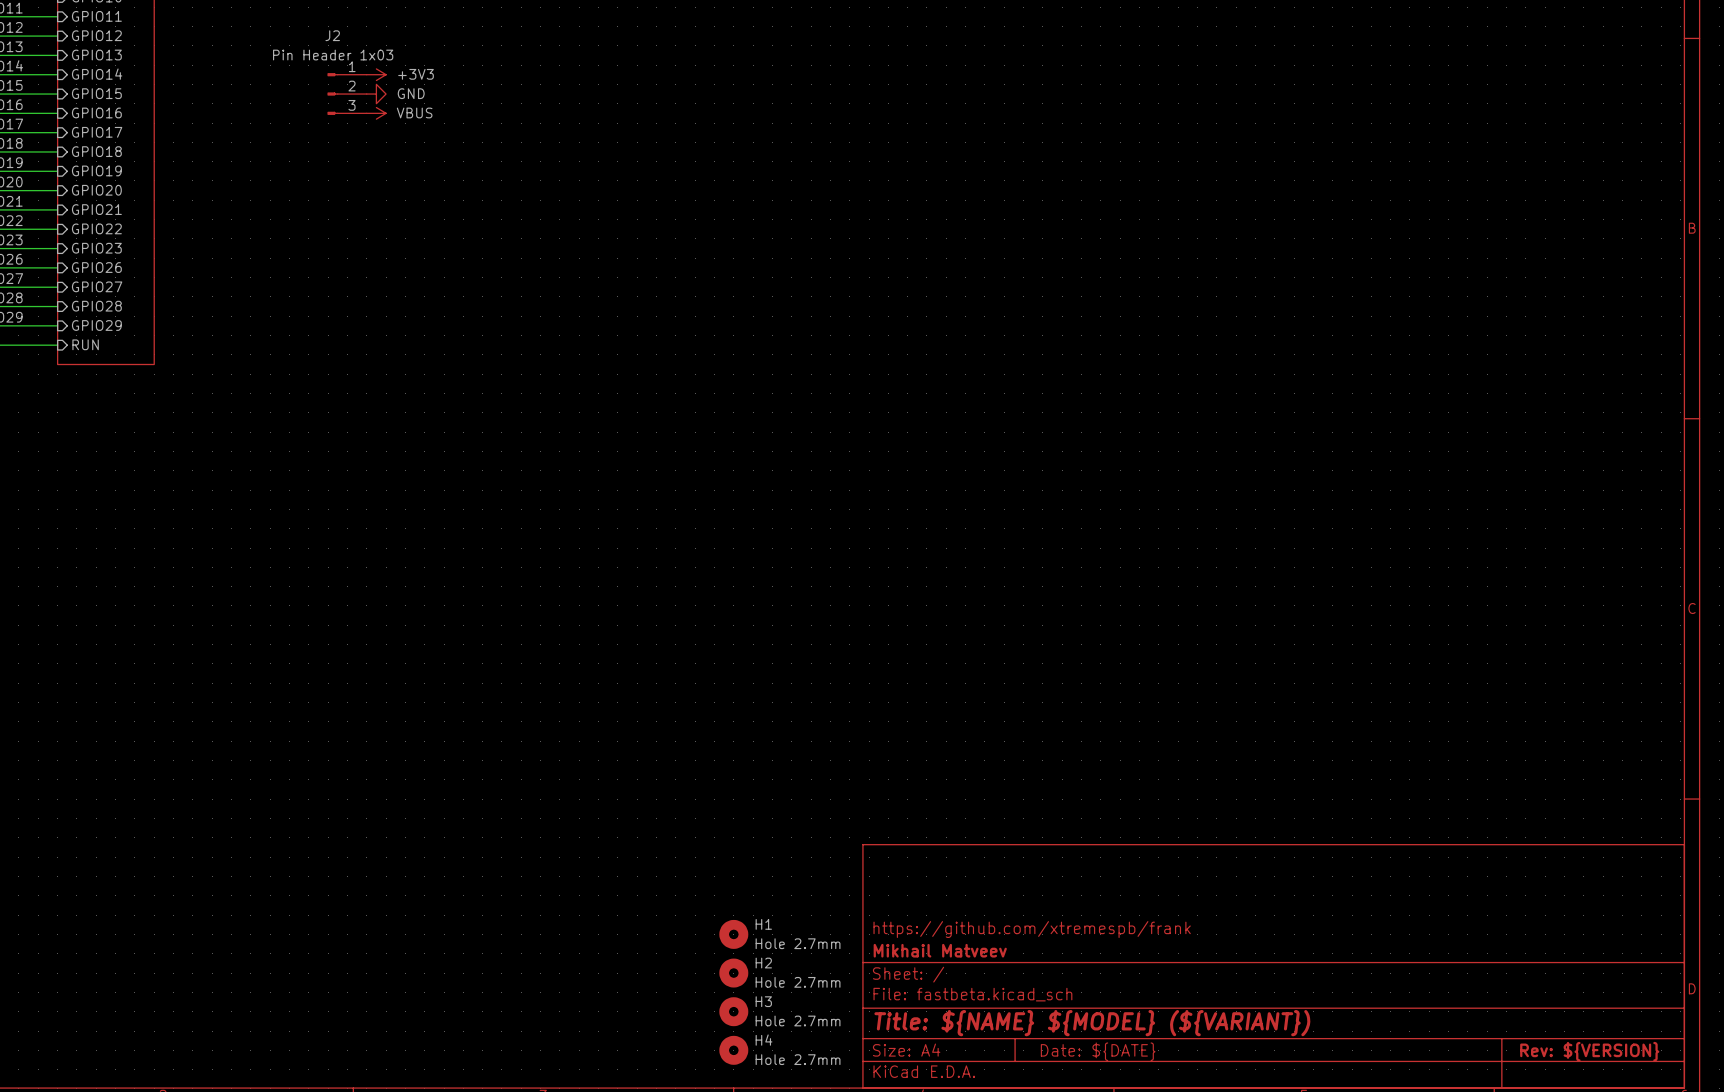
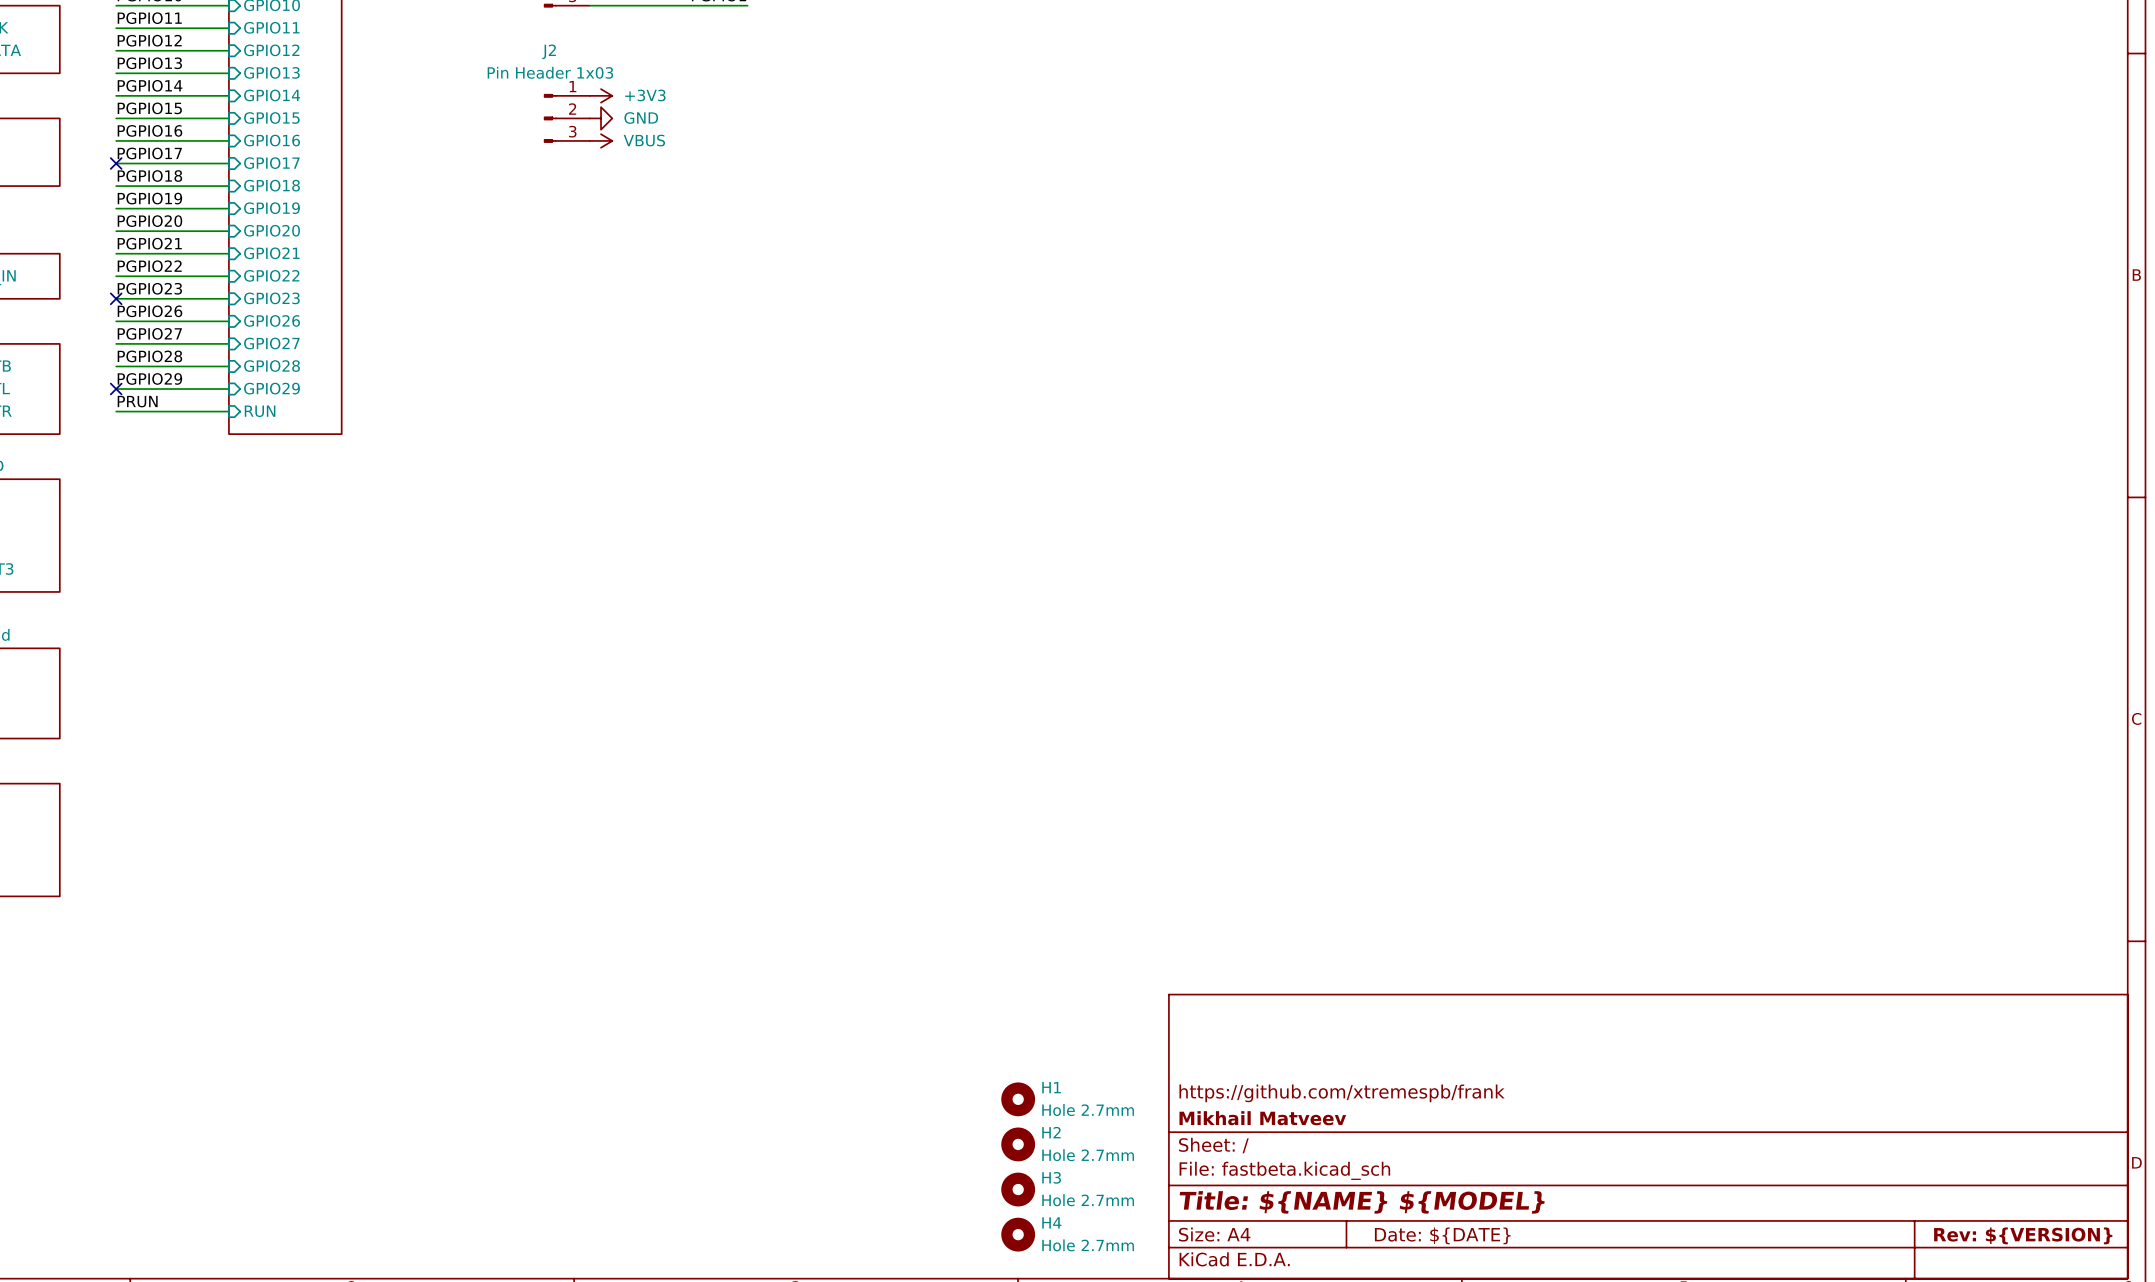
title block: Title: ${NAME} ${MODEL} (${VARIANT}) (1092, 1023) -> Title: ${NAME} ${MODEL} (1362, 1202)

